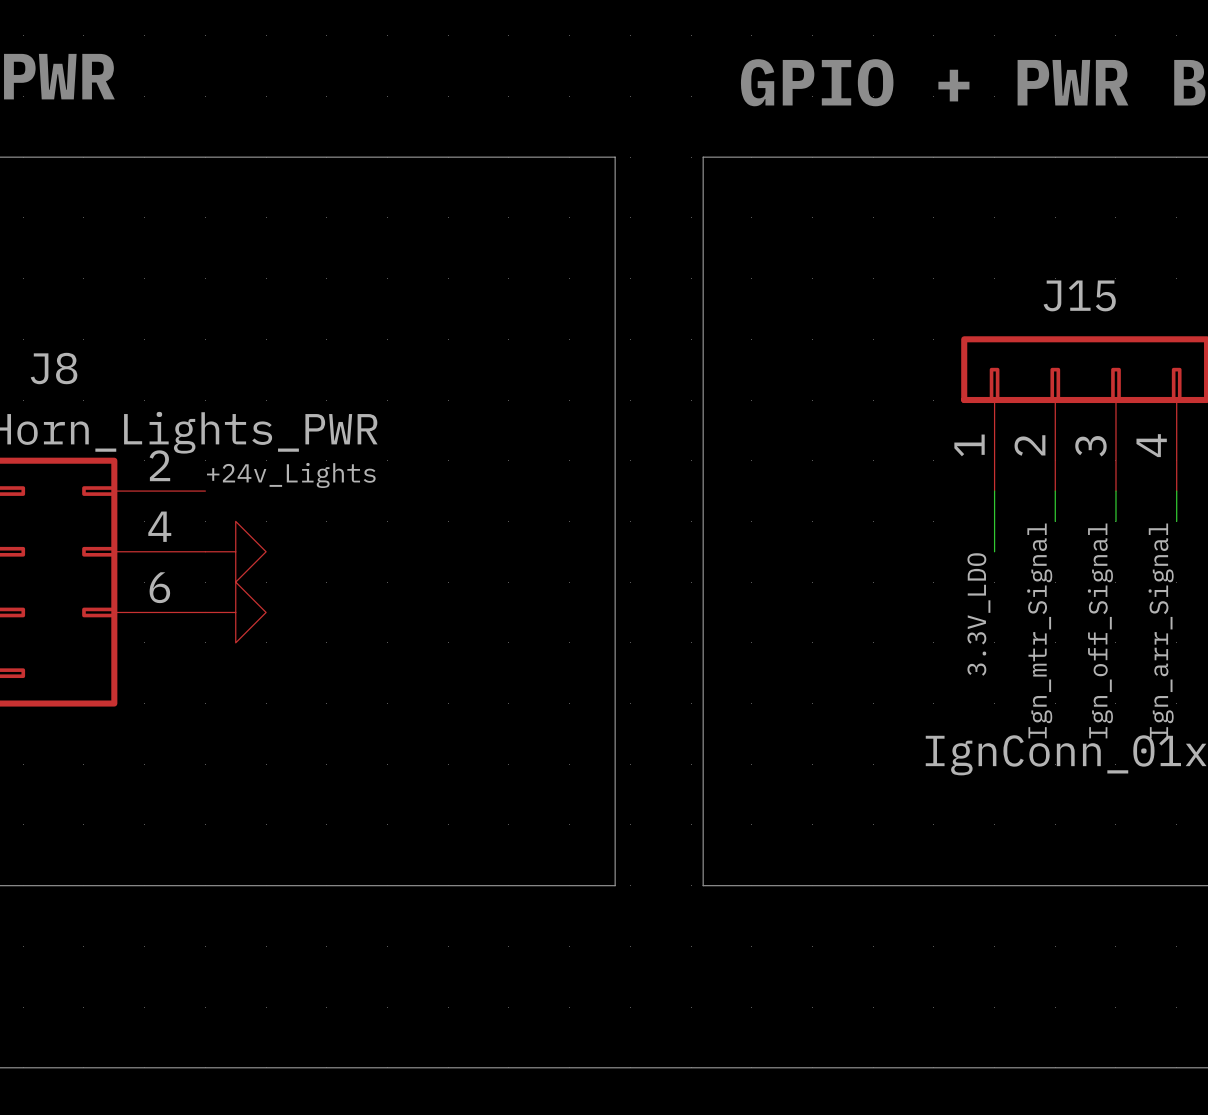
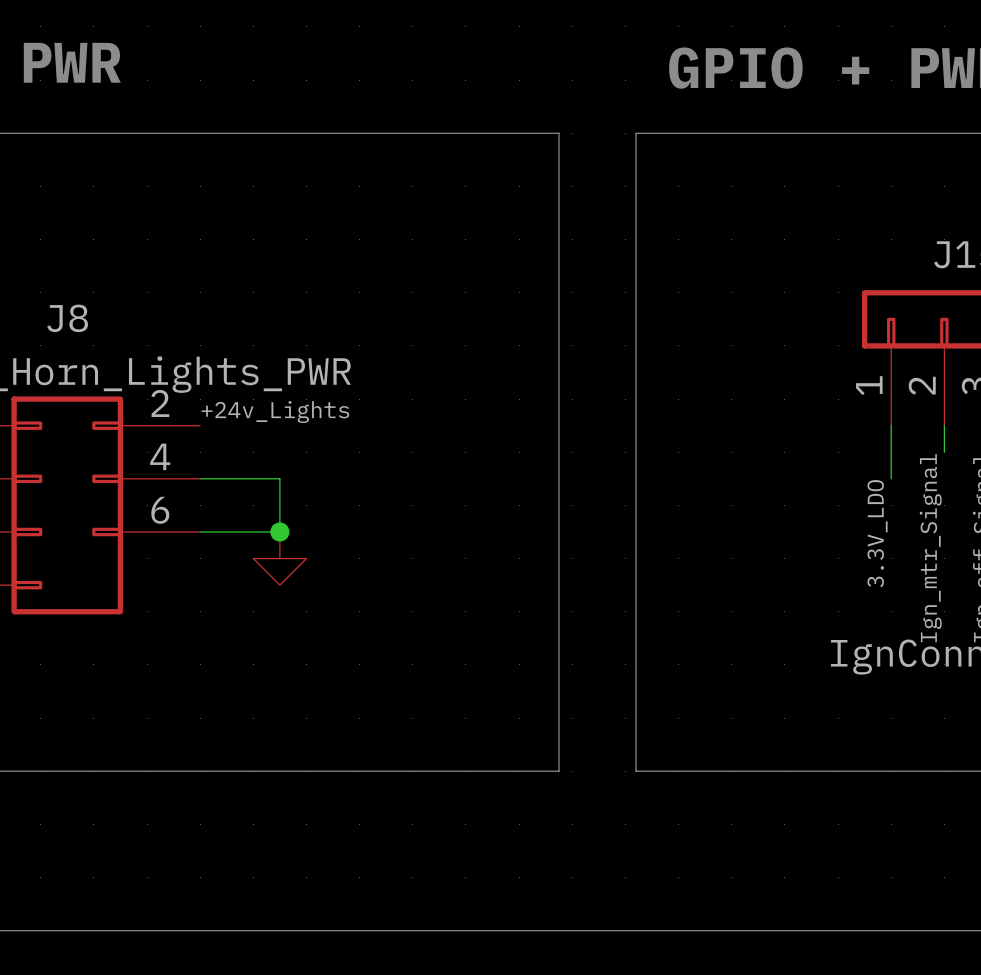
wire: none -> (200, 478) (279, 478) (279, 531) (200, 531)
power symbol: (235, 551) -> none
power symbol: (235, 612) -> none
junction: none -> (279, 531)
power symbol: none -> (279, 558)

